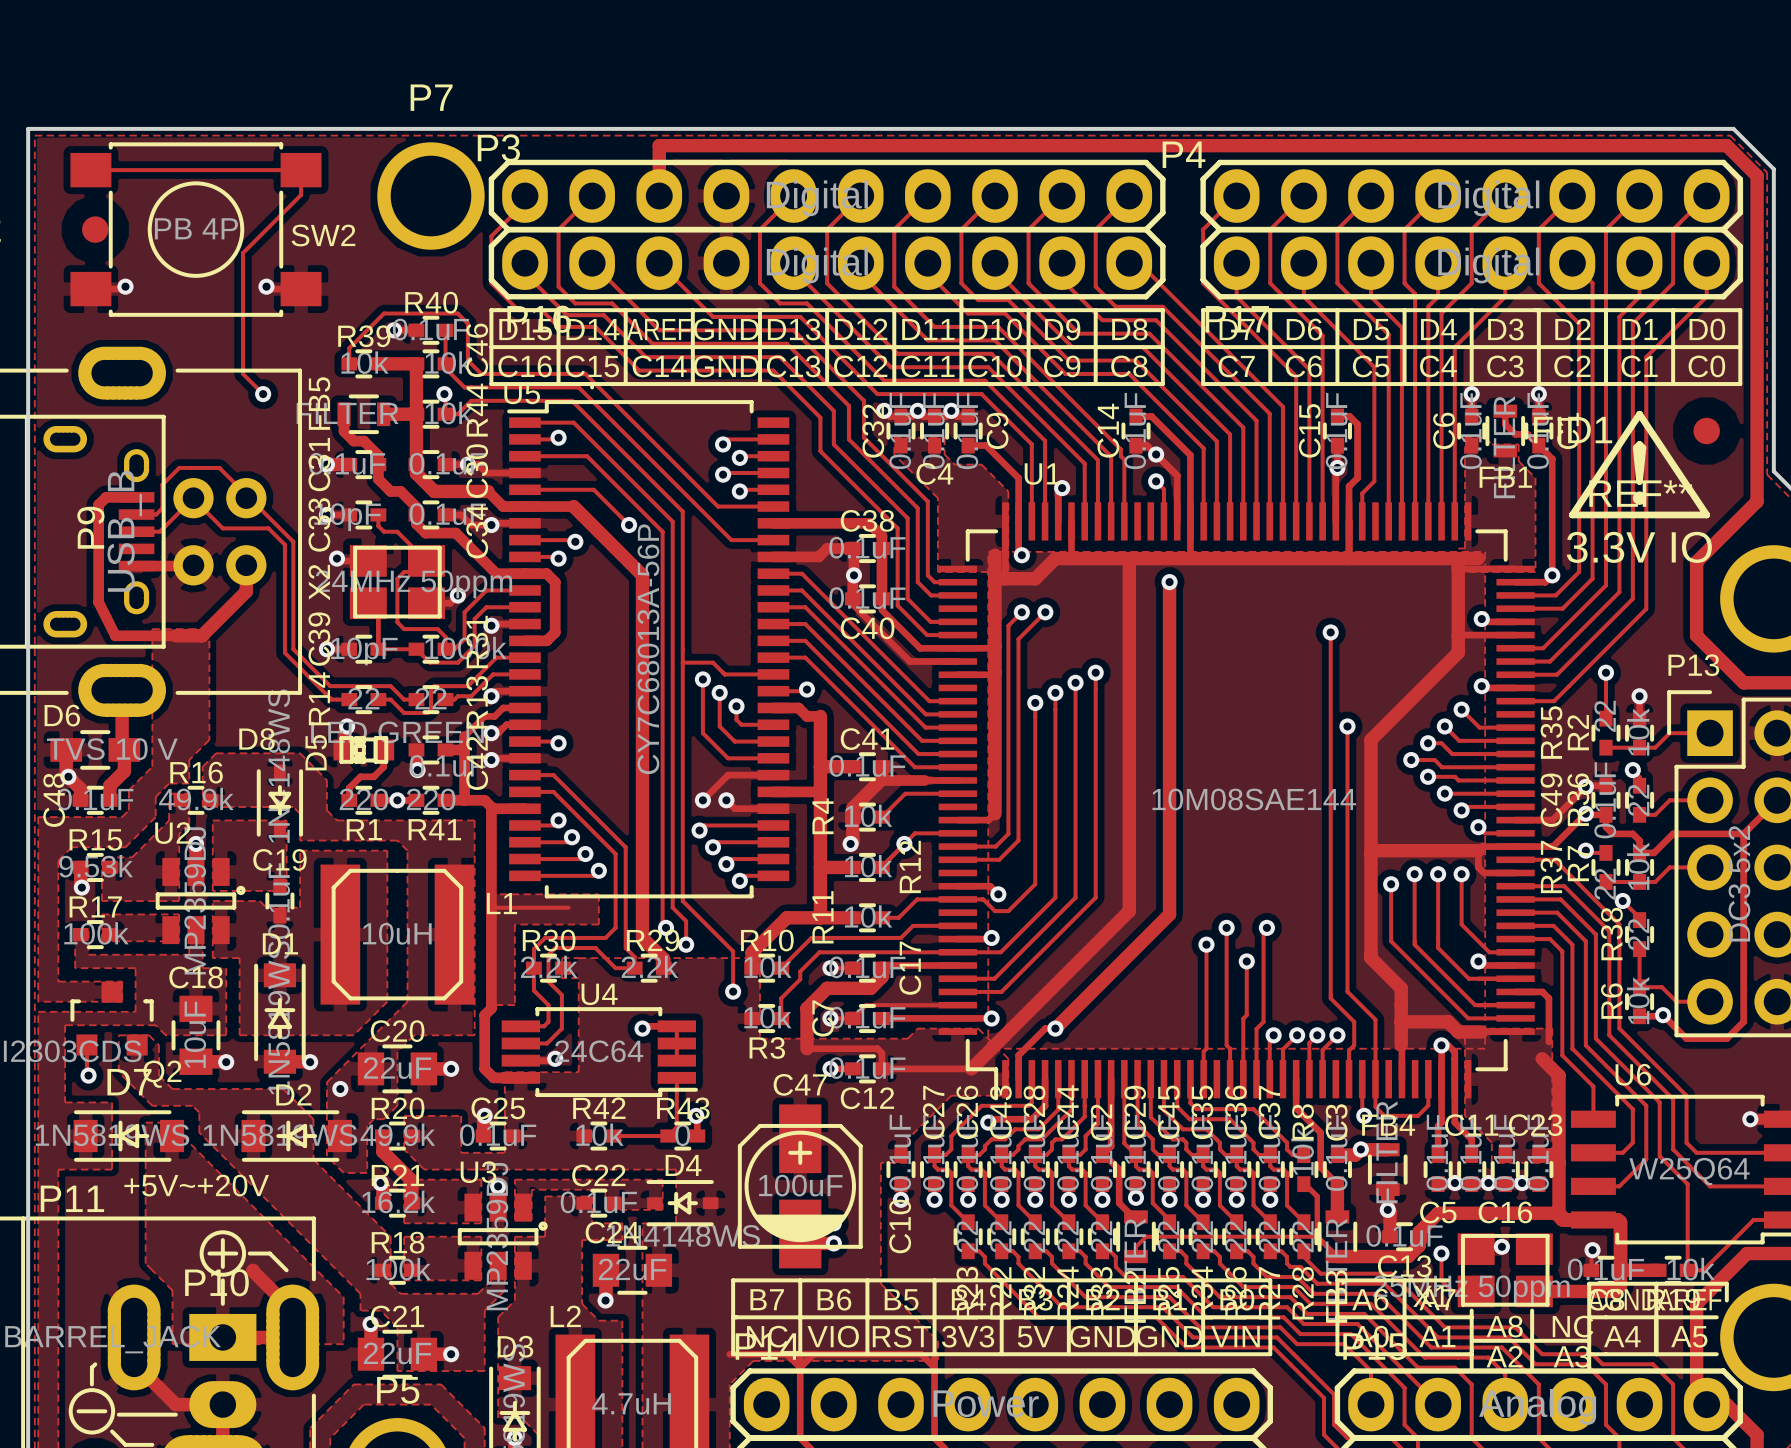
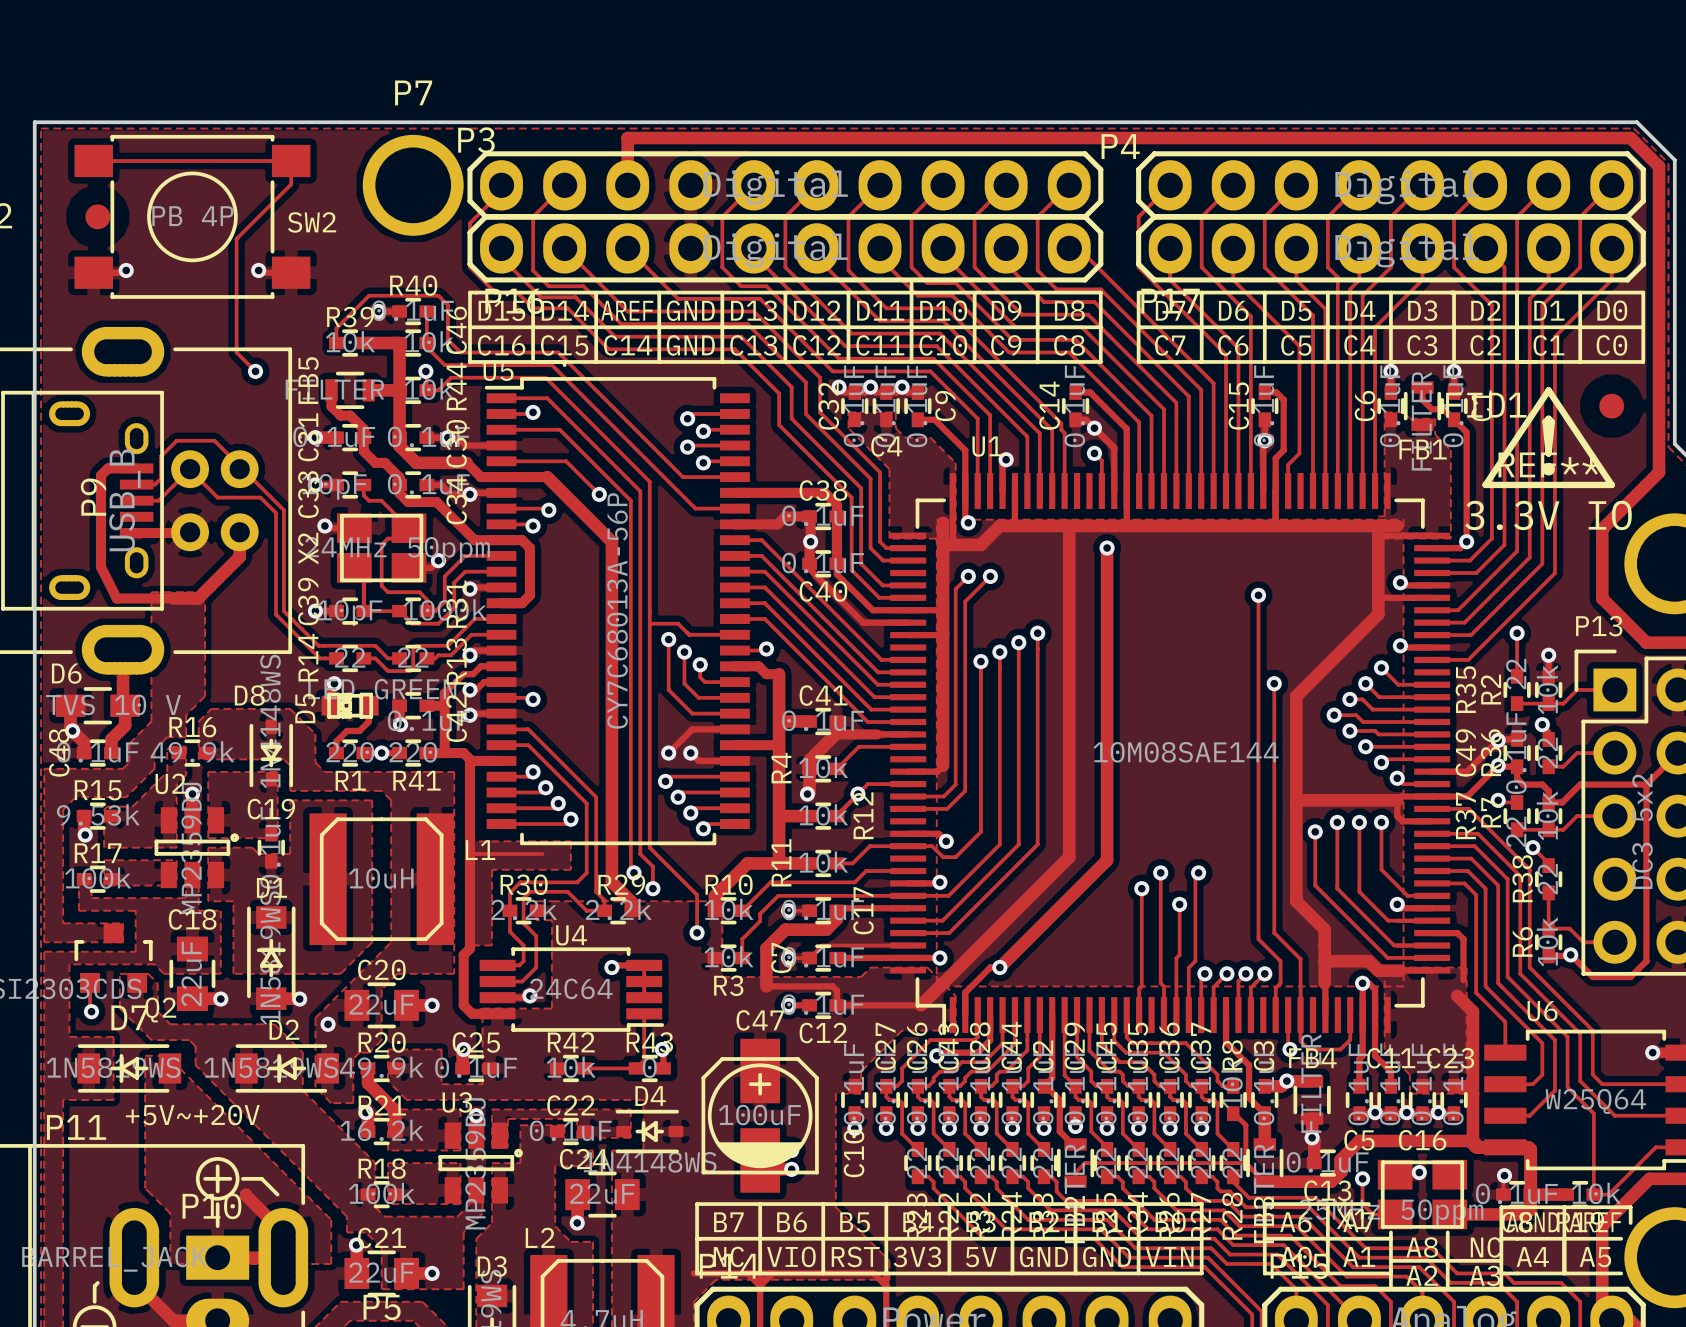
C18 value: 10uF (195, 1034) -> 22uF (191, 973)

